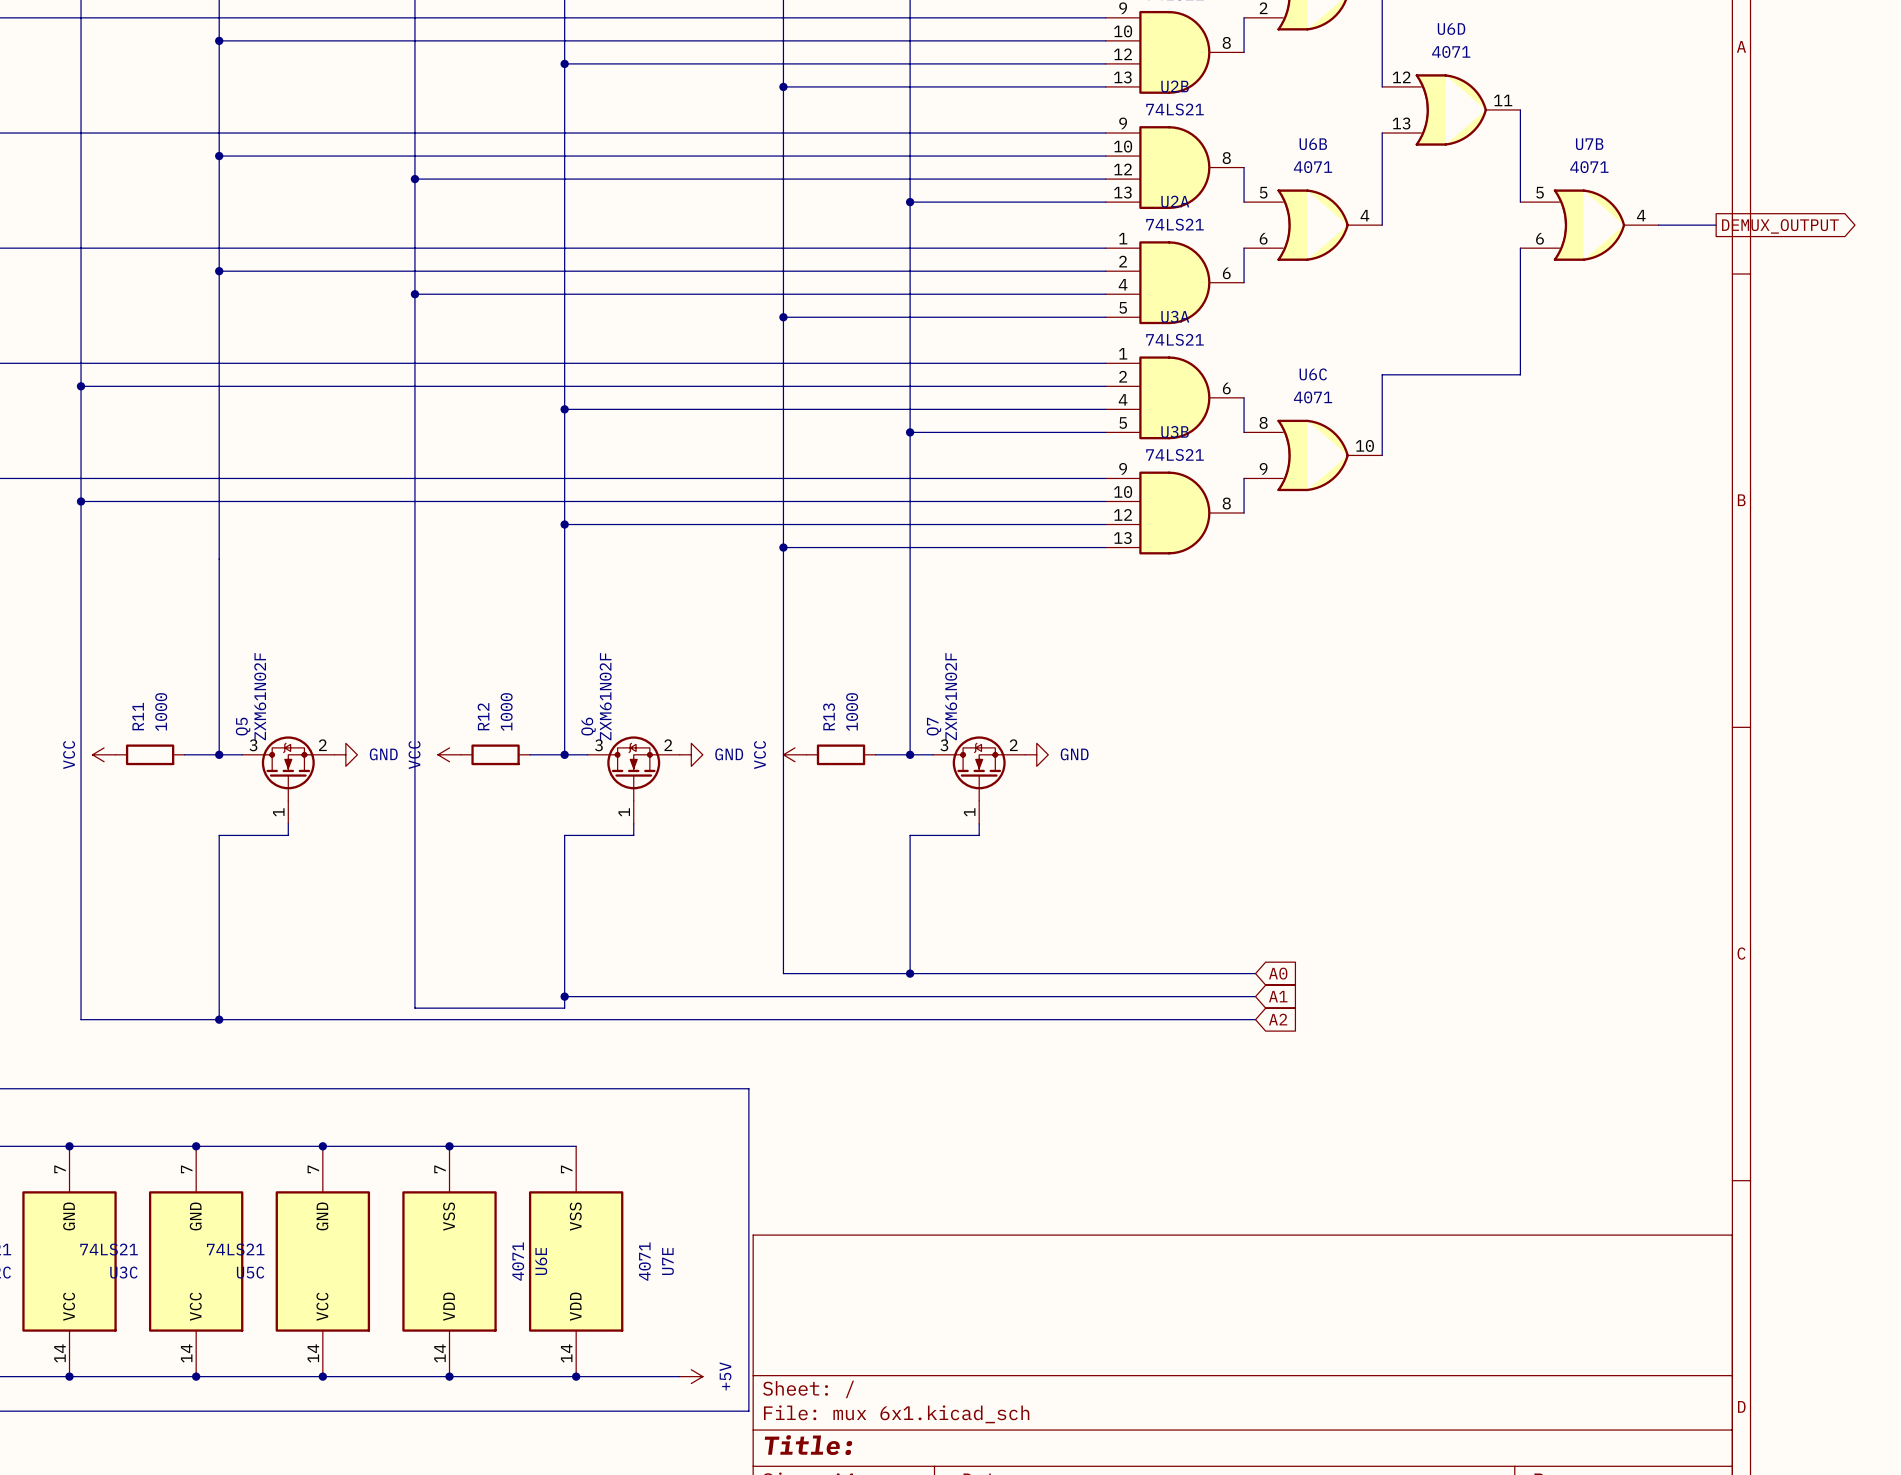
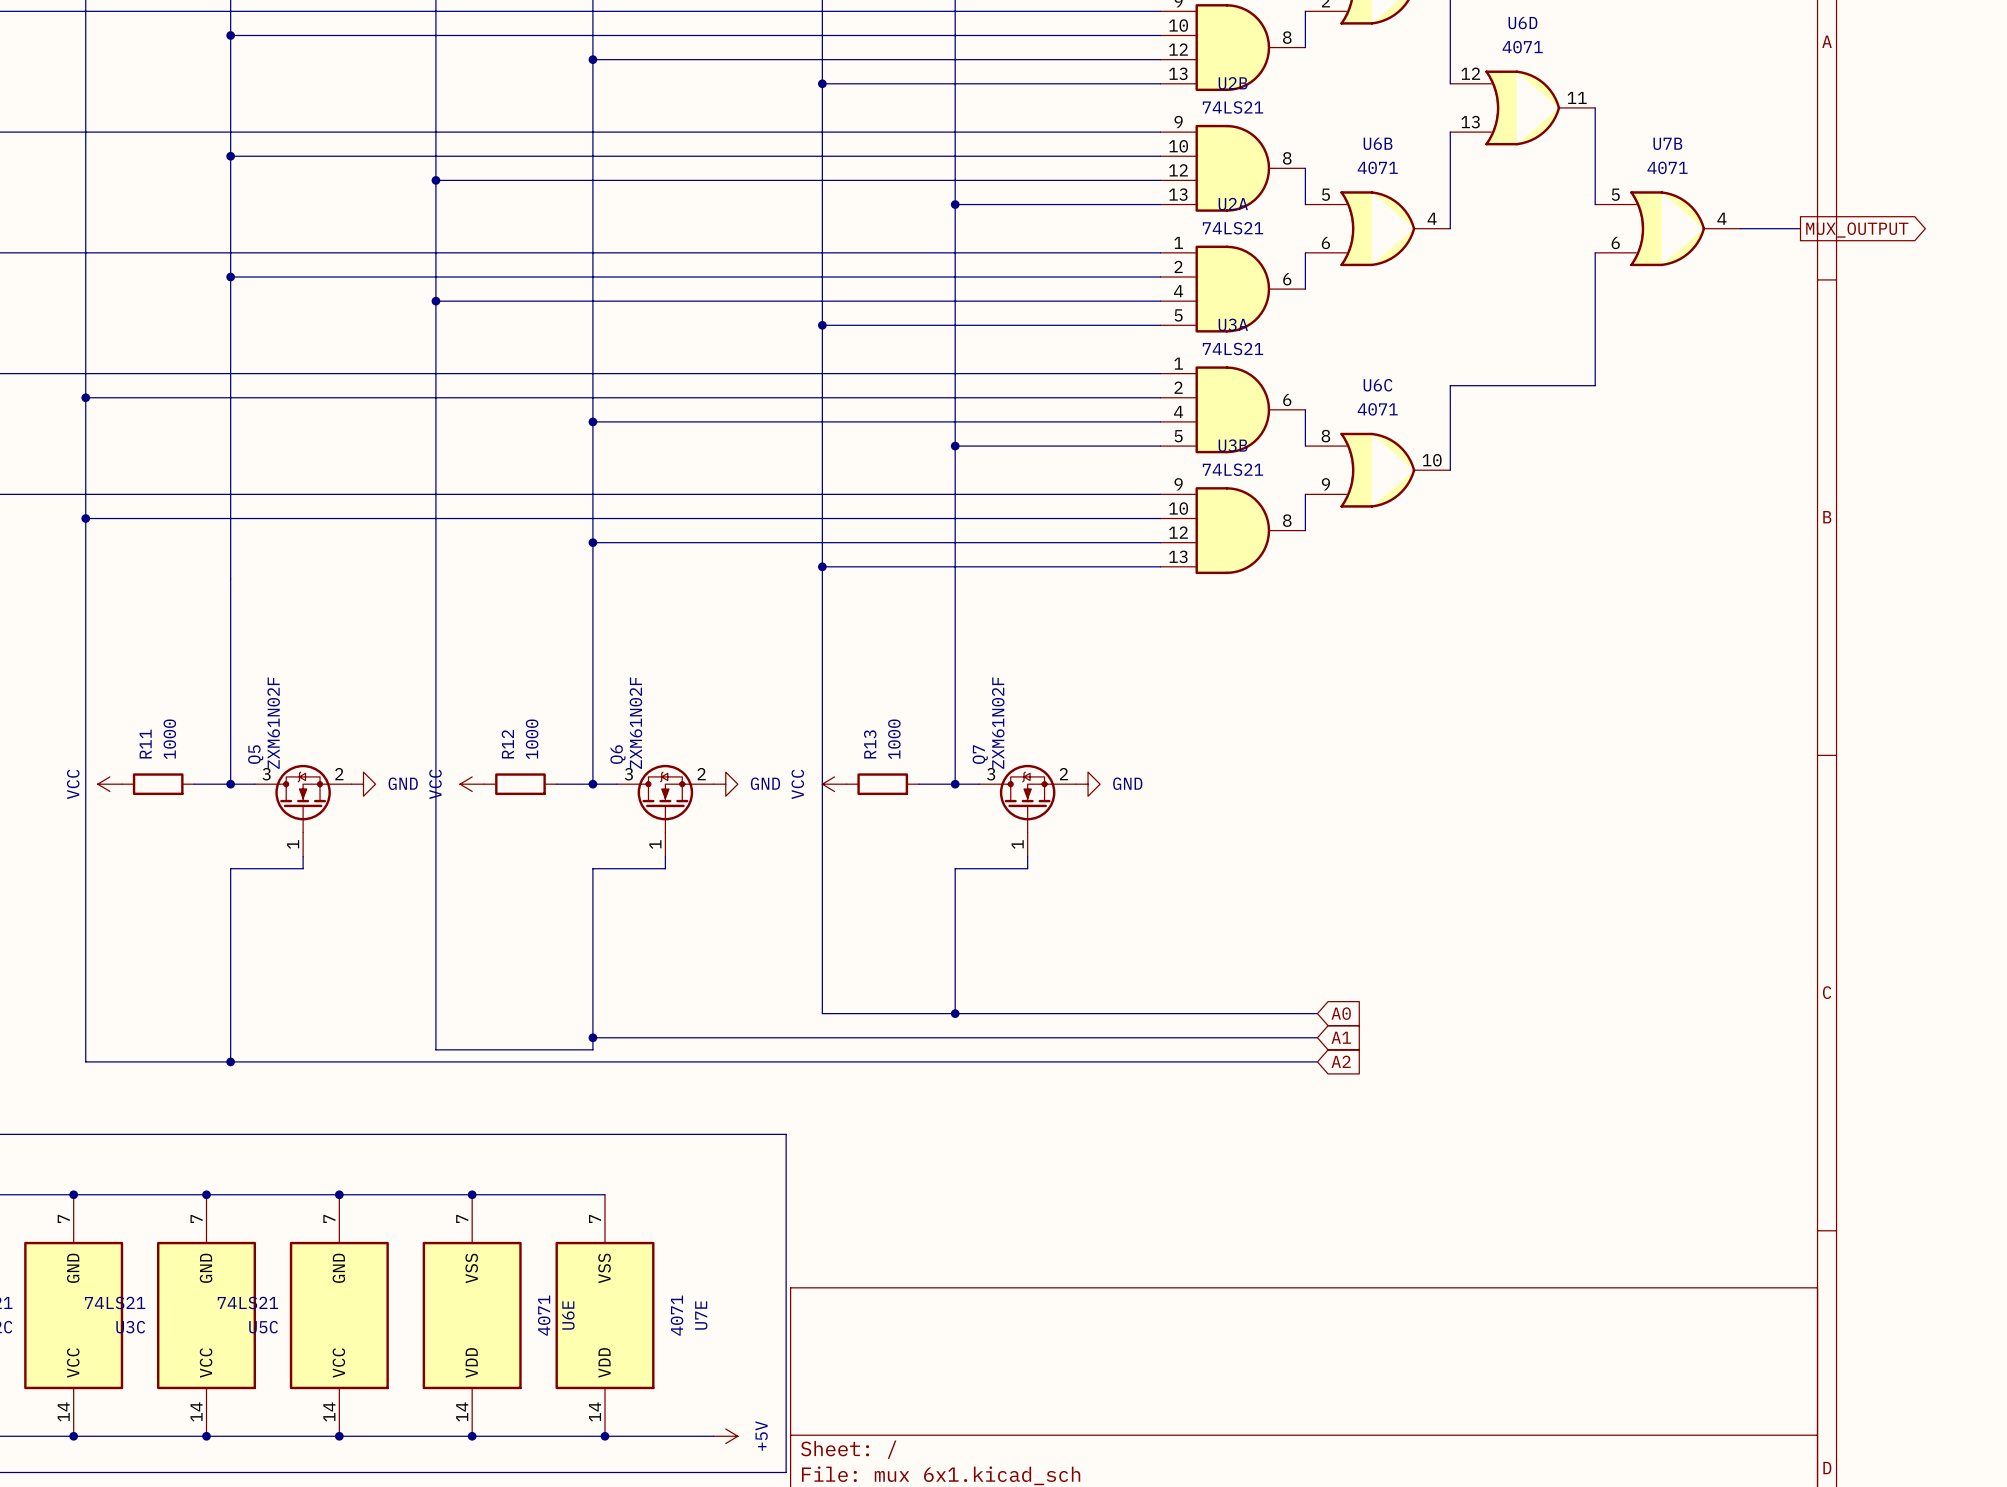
global label: DEMUX_OUTPUT (1780, 226) -> MUX_OUTPUT (1857, 230)

